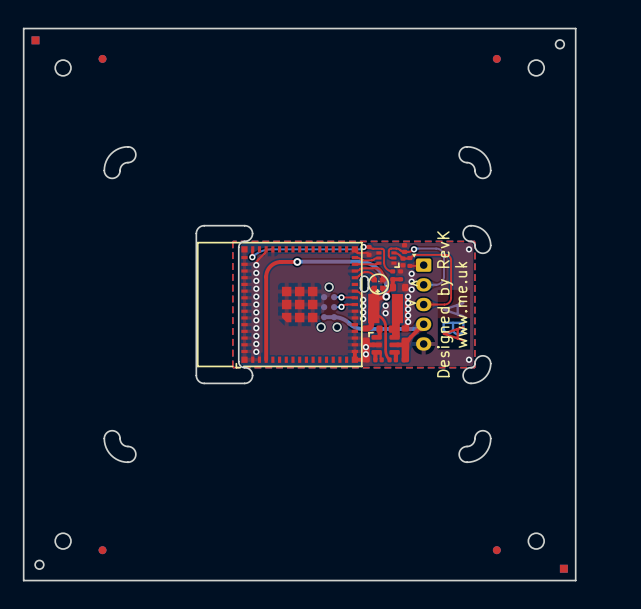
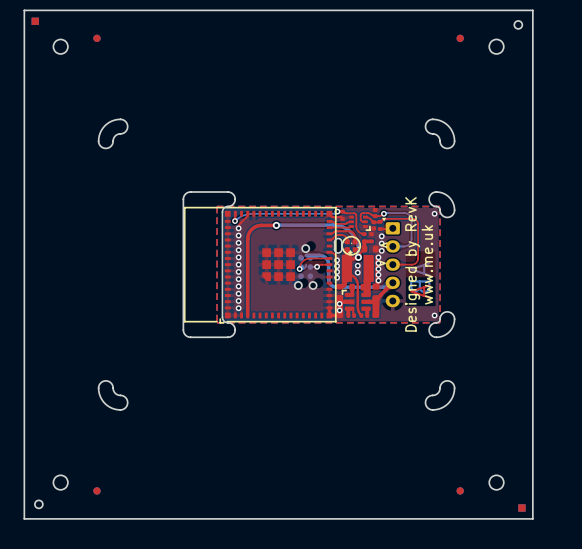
top track: (341, 297) (354, 297) -> (299, 269) (301, 262) (306, 259) (329, 258)
via position: (341, 297) -> (299, 269)
bottom track: none -> (306, 264) (304, 268) (299, 269)
bottom track: (324, 317) (340, 318) (353, 326) (362, 328) -> (306, 255) (320, 255) (326, 258) (328, 263) (329, 282) (336, 287)

